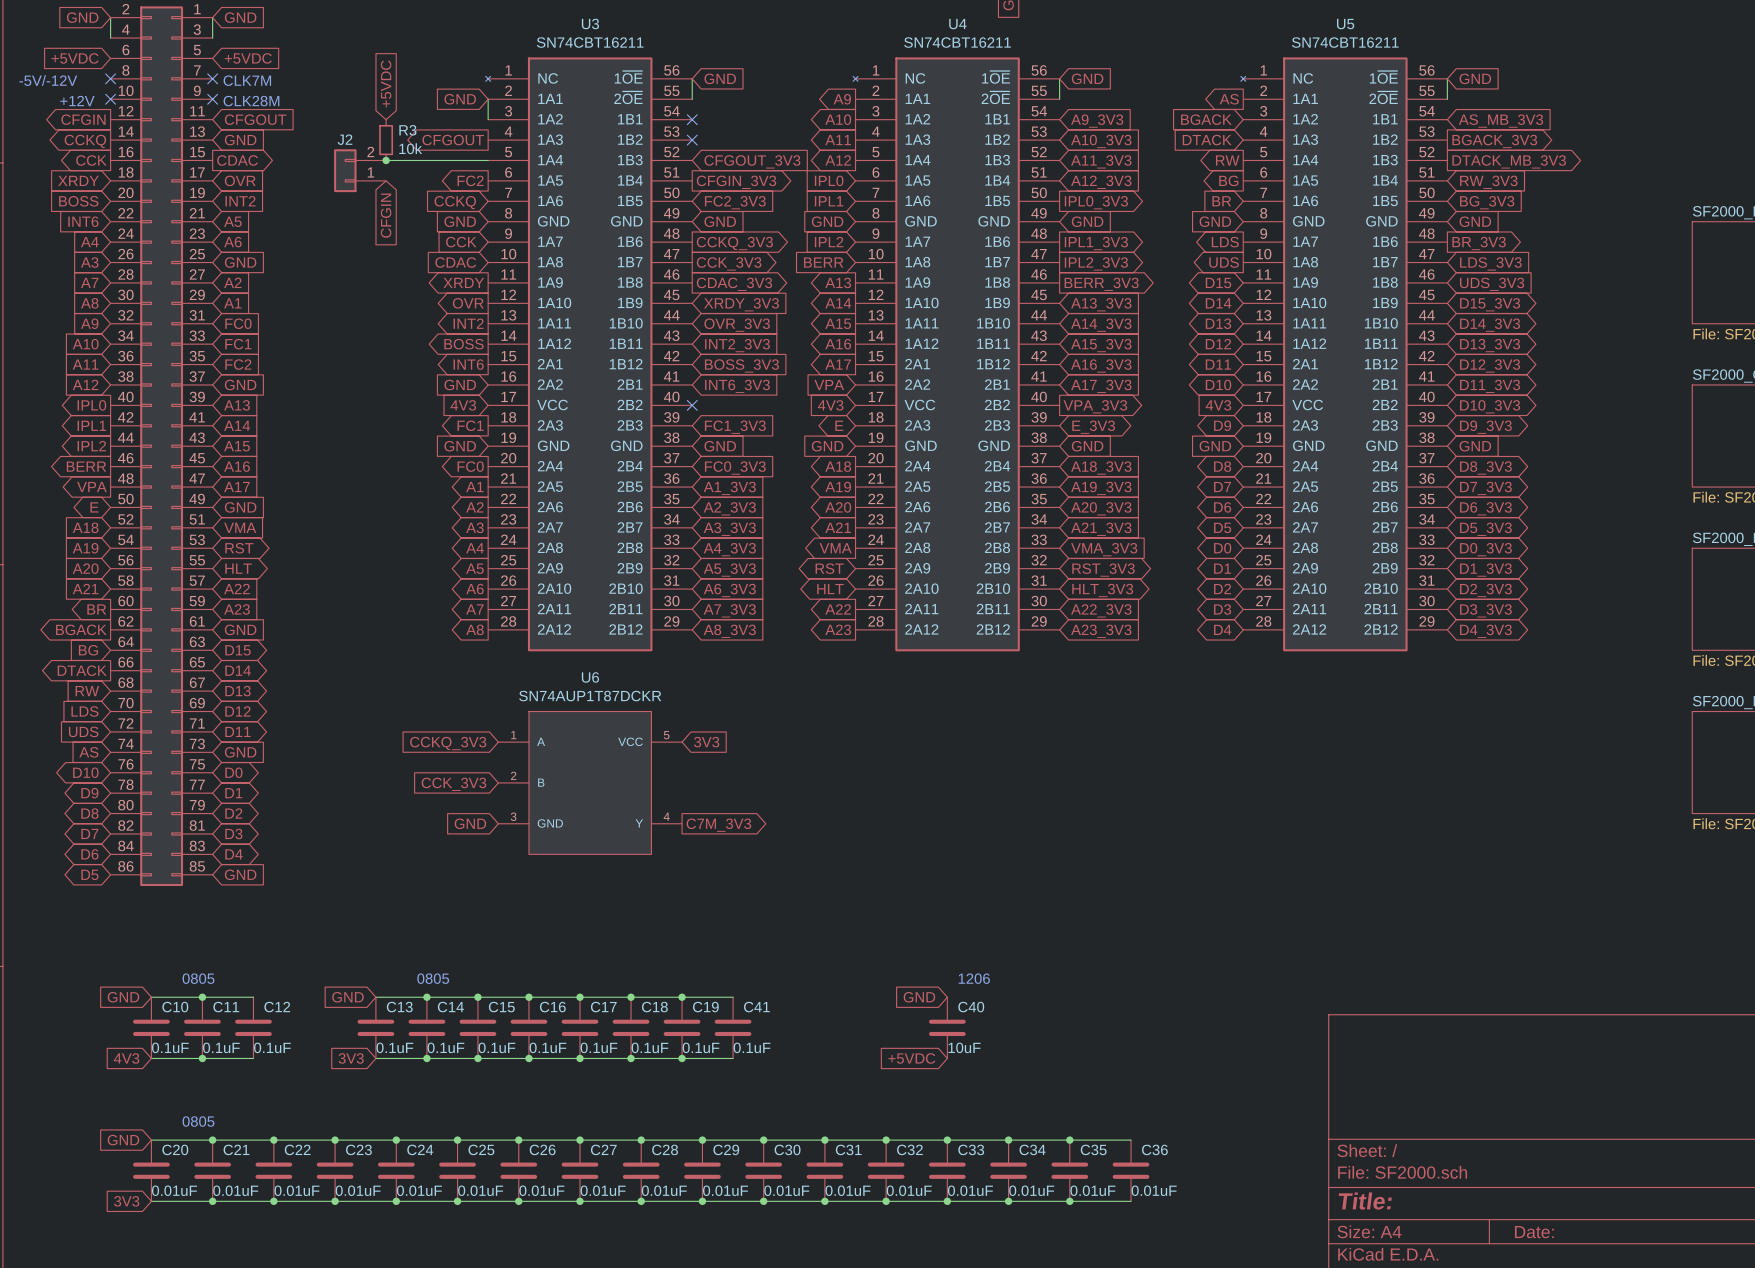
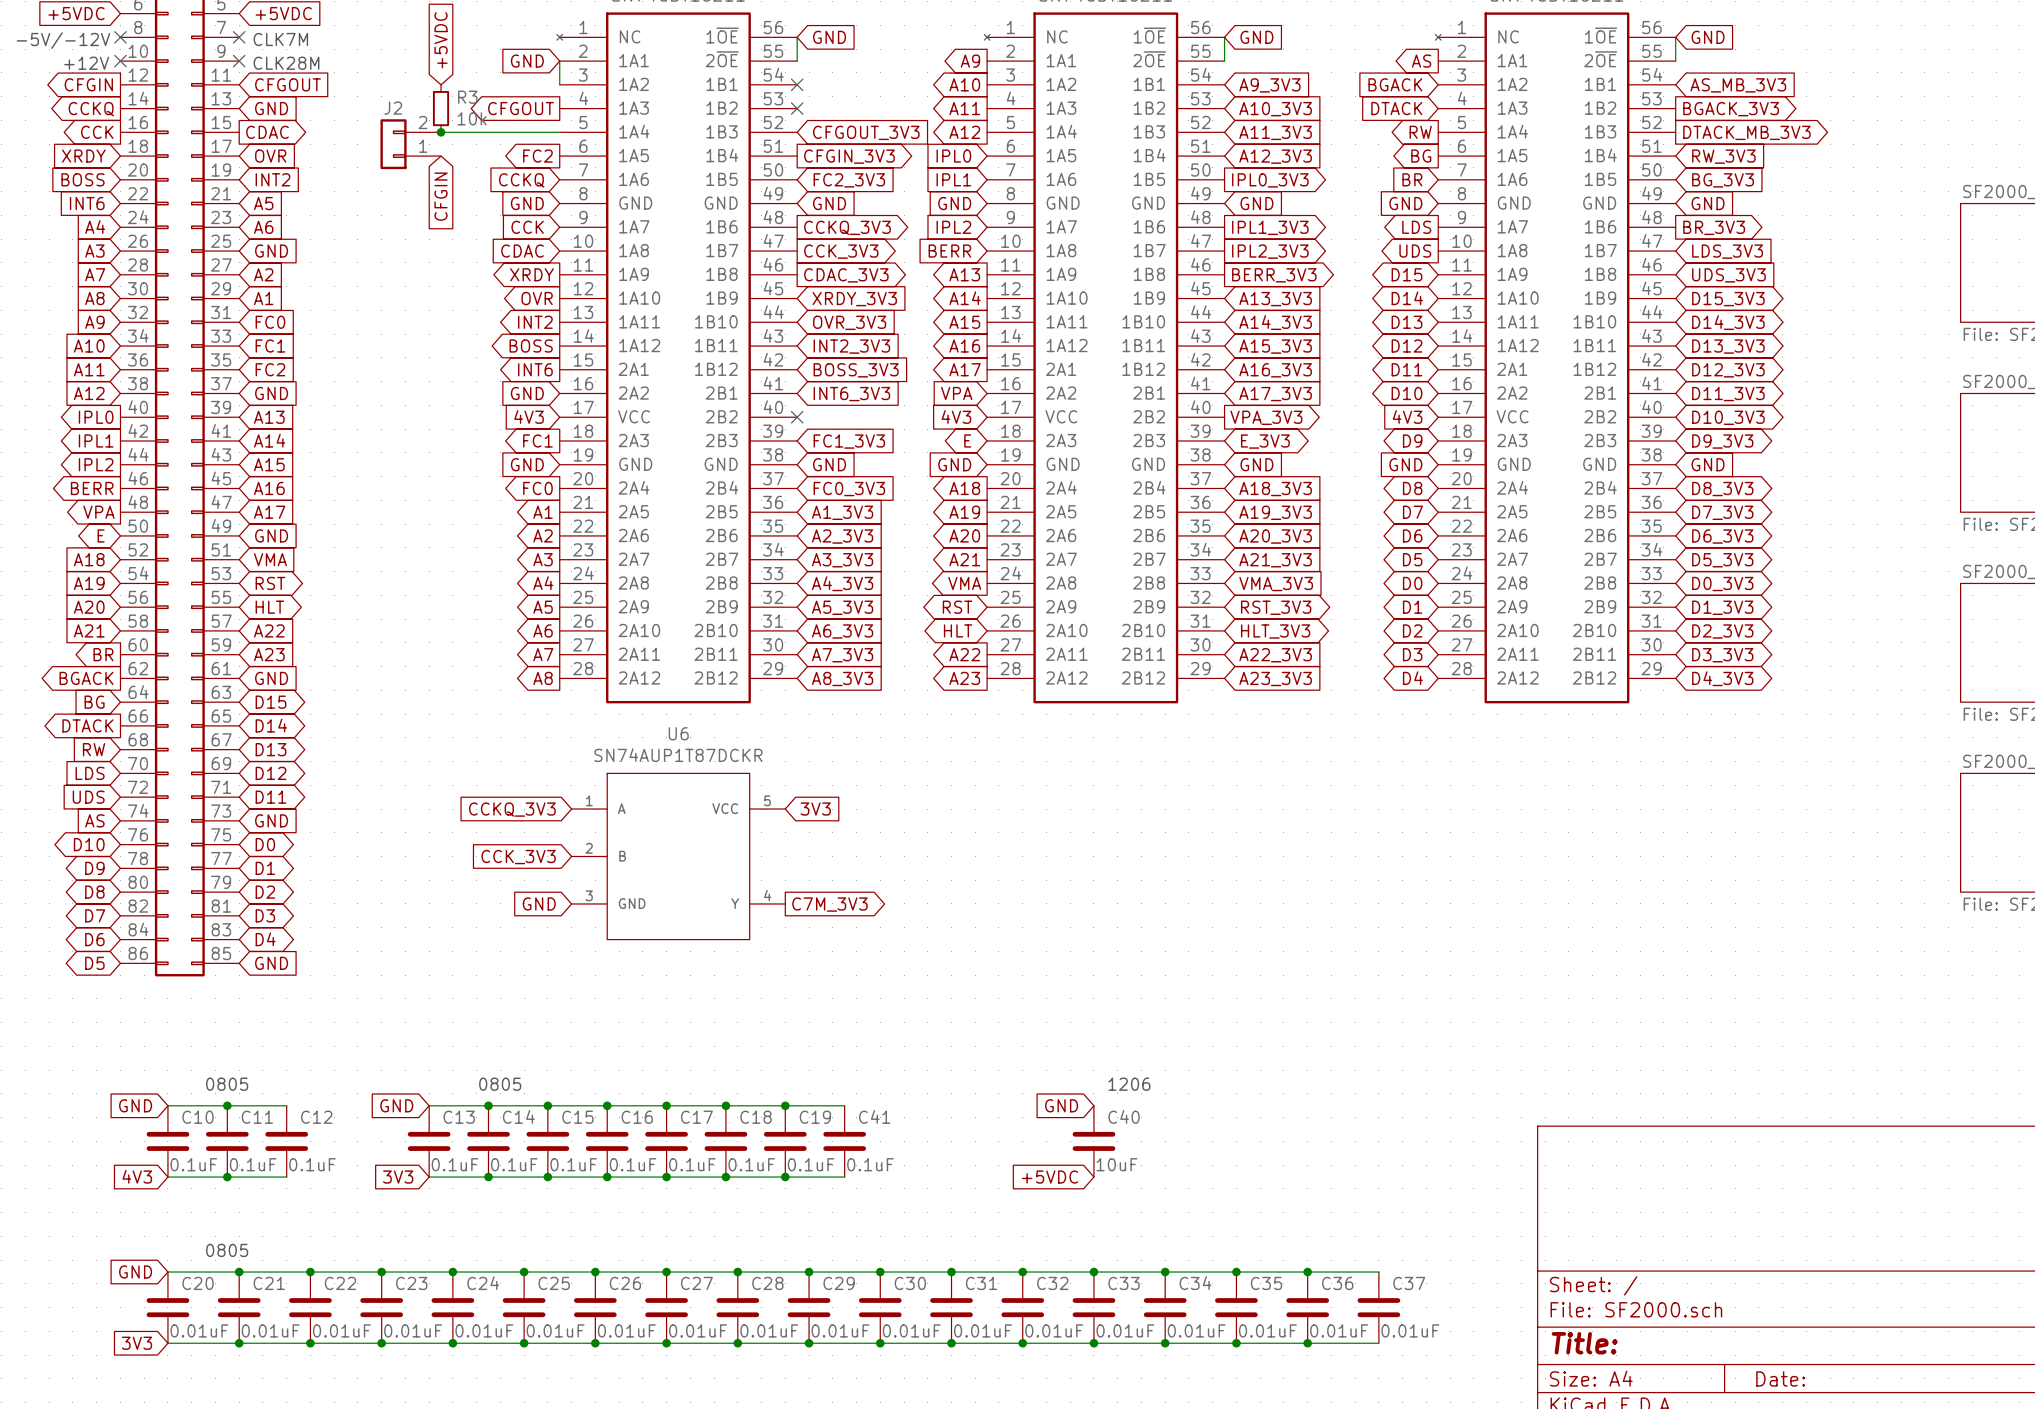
wire: none -> (1307, 1272) (1378, 1272)
junction: none -> (1307, 1272)
C37: none -> 0.01uF (1378, 1307)
wire: none -> (1307, 1343) (1378, 1343)
junction: none -> (1307, 1343)

